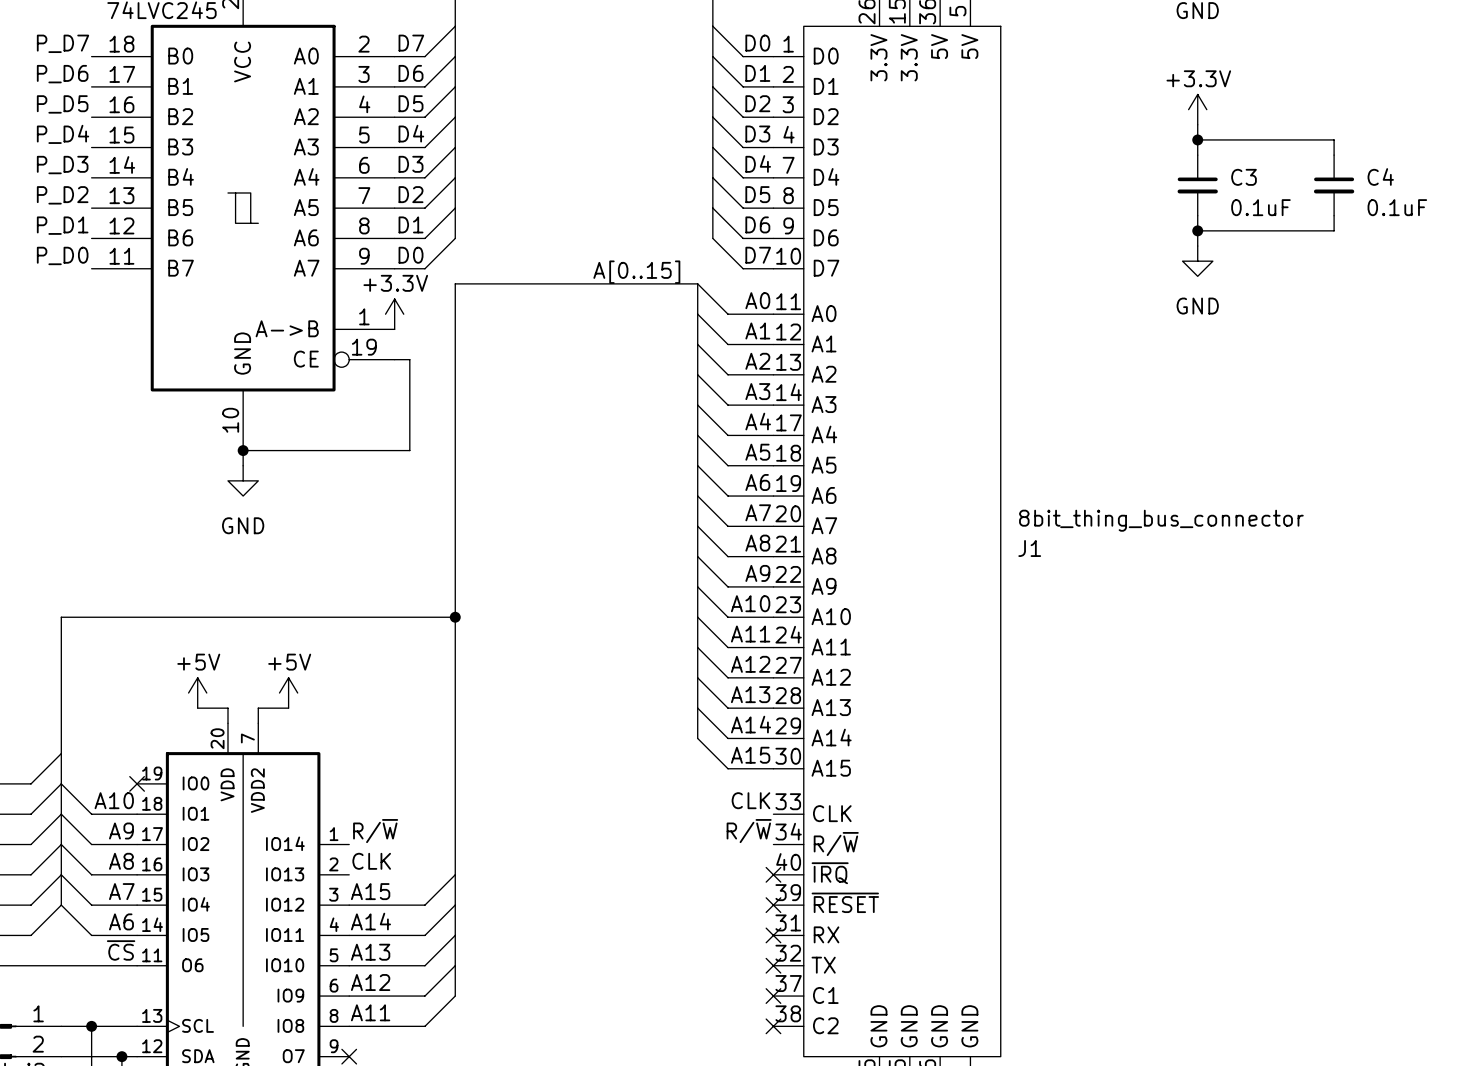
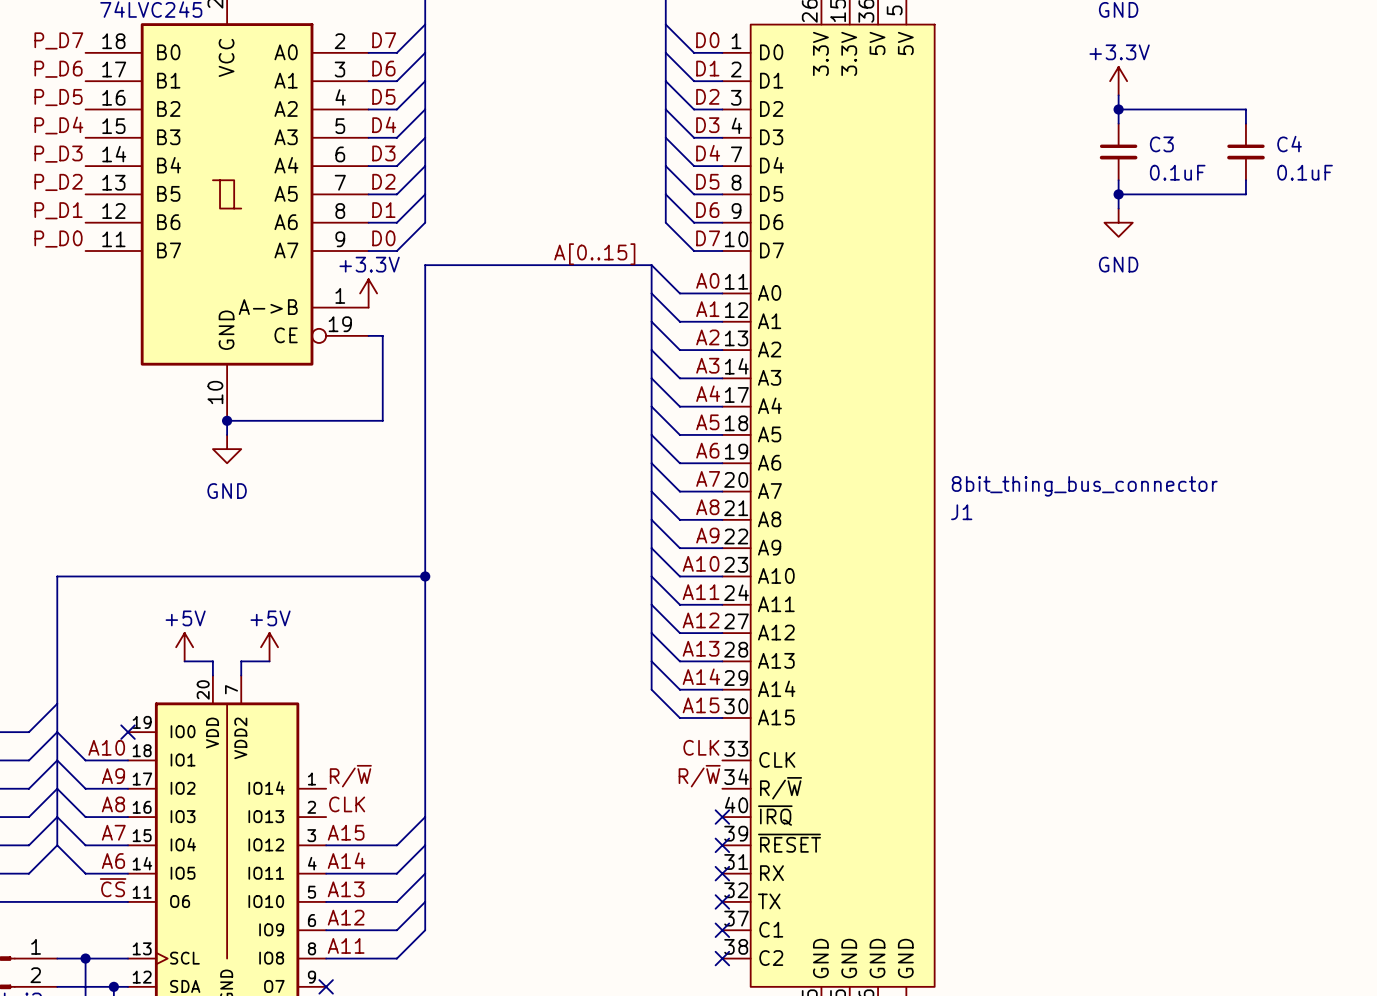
power symbol position: +3.3V (1197, 109) -> +3.3V (1118, 81)
wire: (1197, 139) (1334, 139) (1334, 155) -> (1118, 109) (1245, 109) (1245, 123)
junction position: (1197, 139) -> (1118, 109)
C3 position: (1197, 185) -> (1118, 151)
C4 position: (1334, 185) -> (1245, 151)
wire: (1334, 215) (1334, 230) (1197, 230) -> (1245, 180) (1245, 194) (1118, 194)
junction position: (1197, 230) -> (1118, 194)
power symbol position: GND (1197, 261) -> GND (1118, 222)

